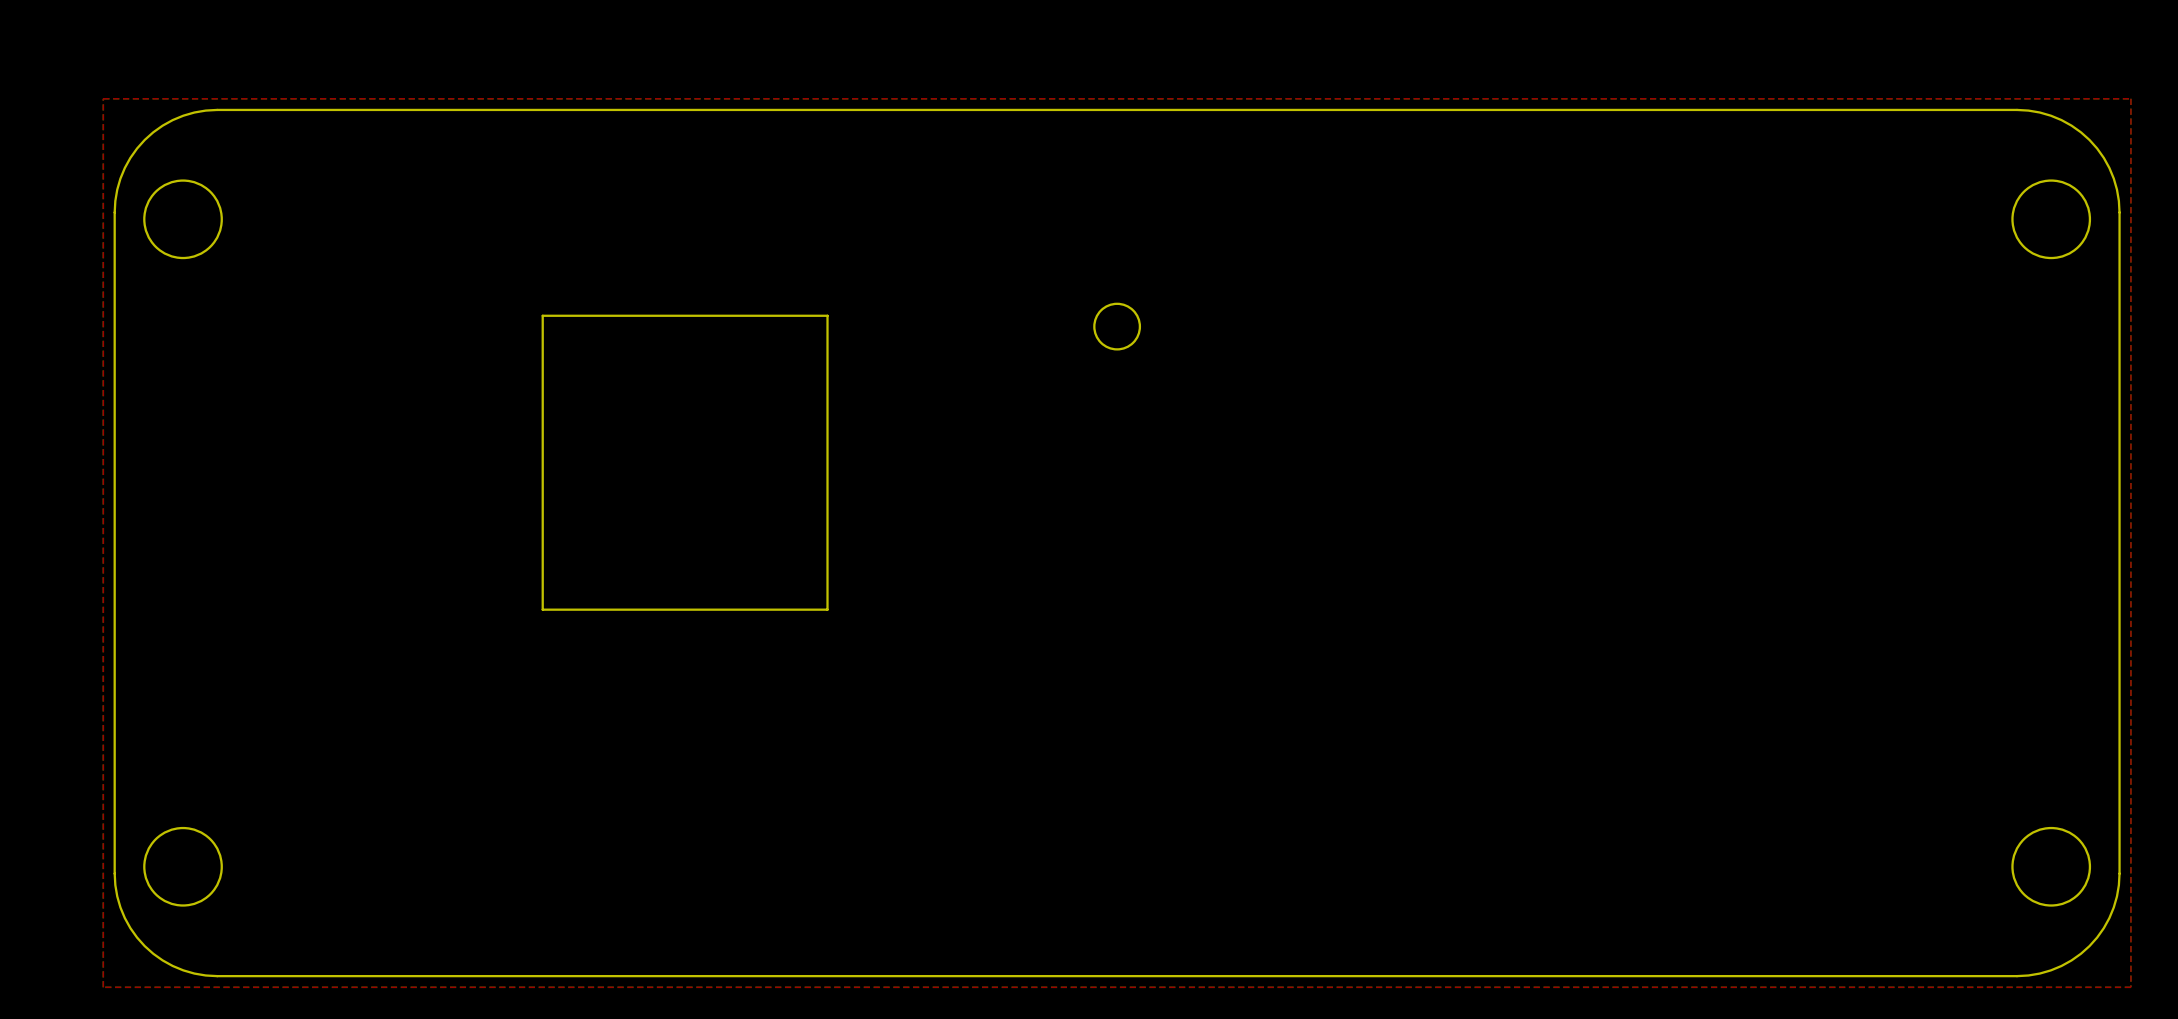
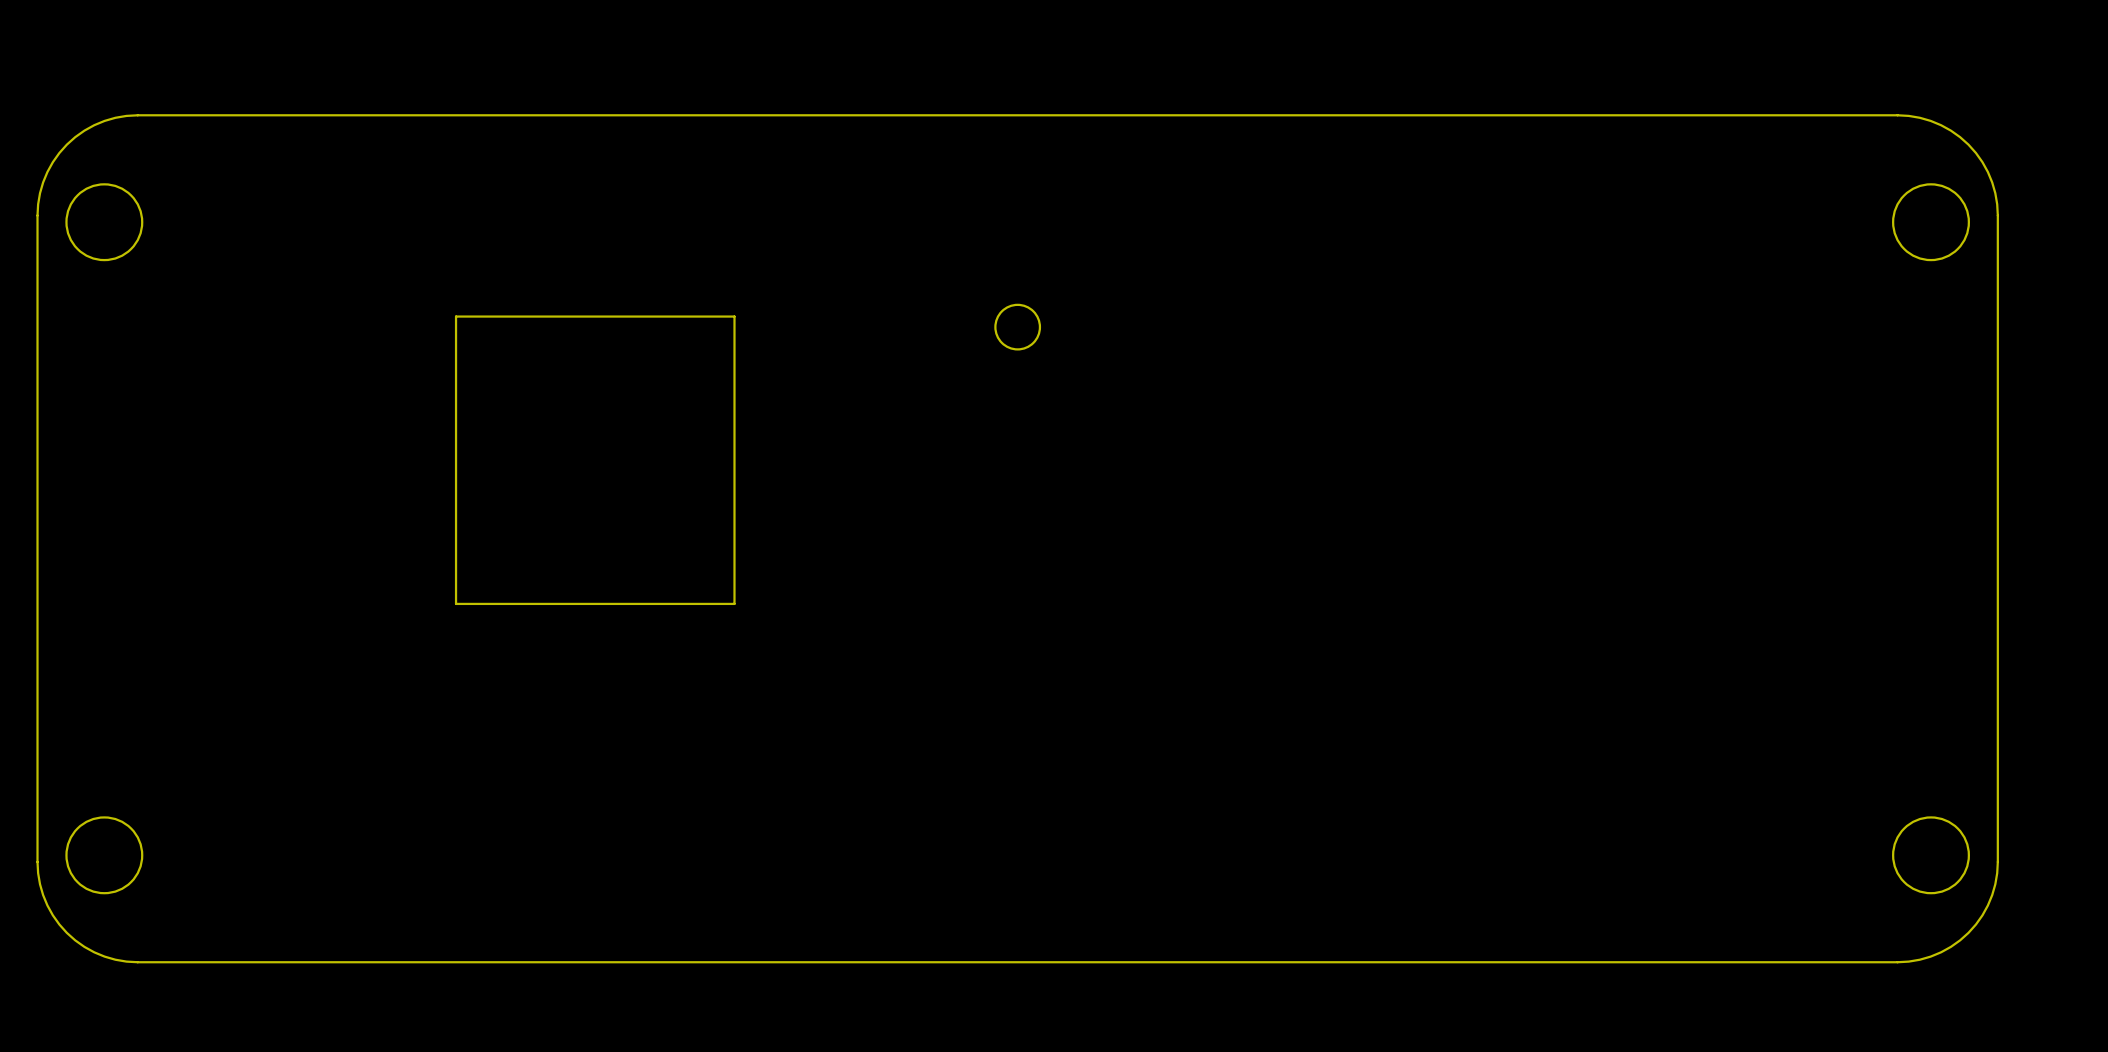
top zone outline: (103, 98) (103, 987) (2130, 987) (2130, 98) (103, 98) -> none

